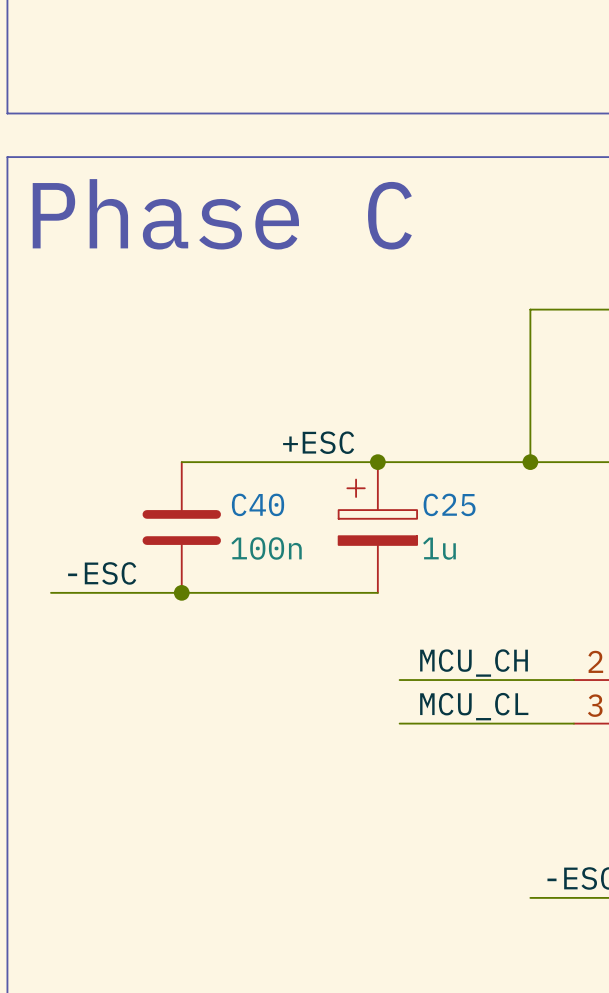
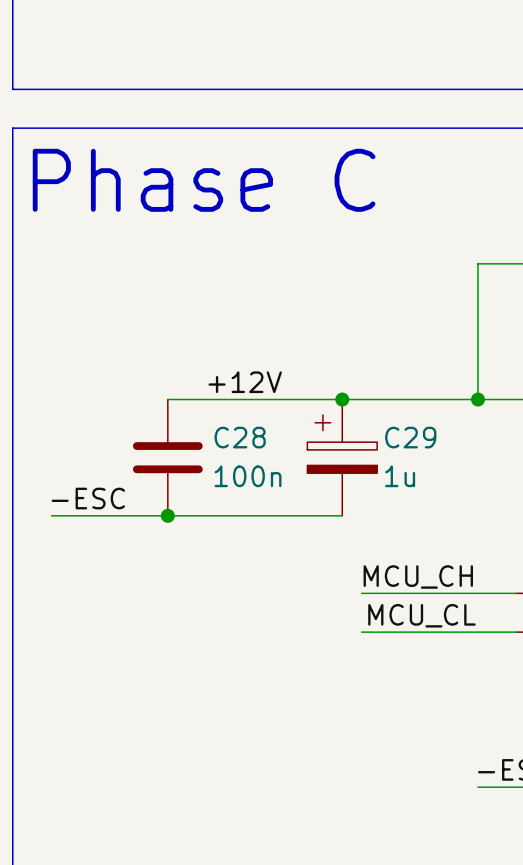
label: none -> +12V (245, 382)
label: +ESC (318, 442) -> none
C40 name: C40 (258, 504) -> C28 (240, 437)
C25 name: C25 (449, 504) -> C29 (410, 437)

